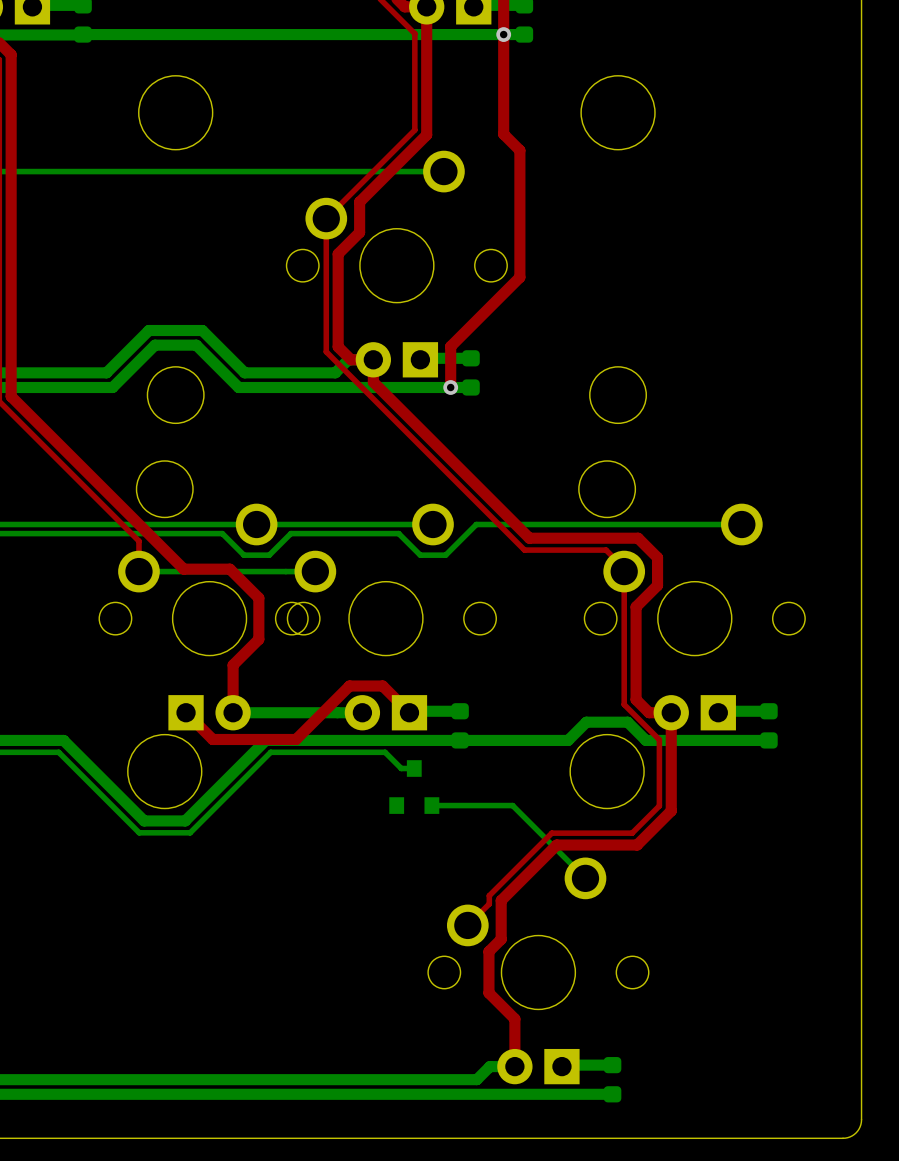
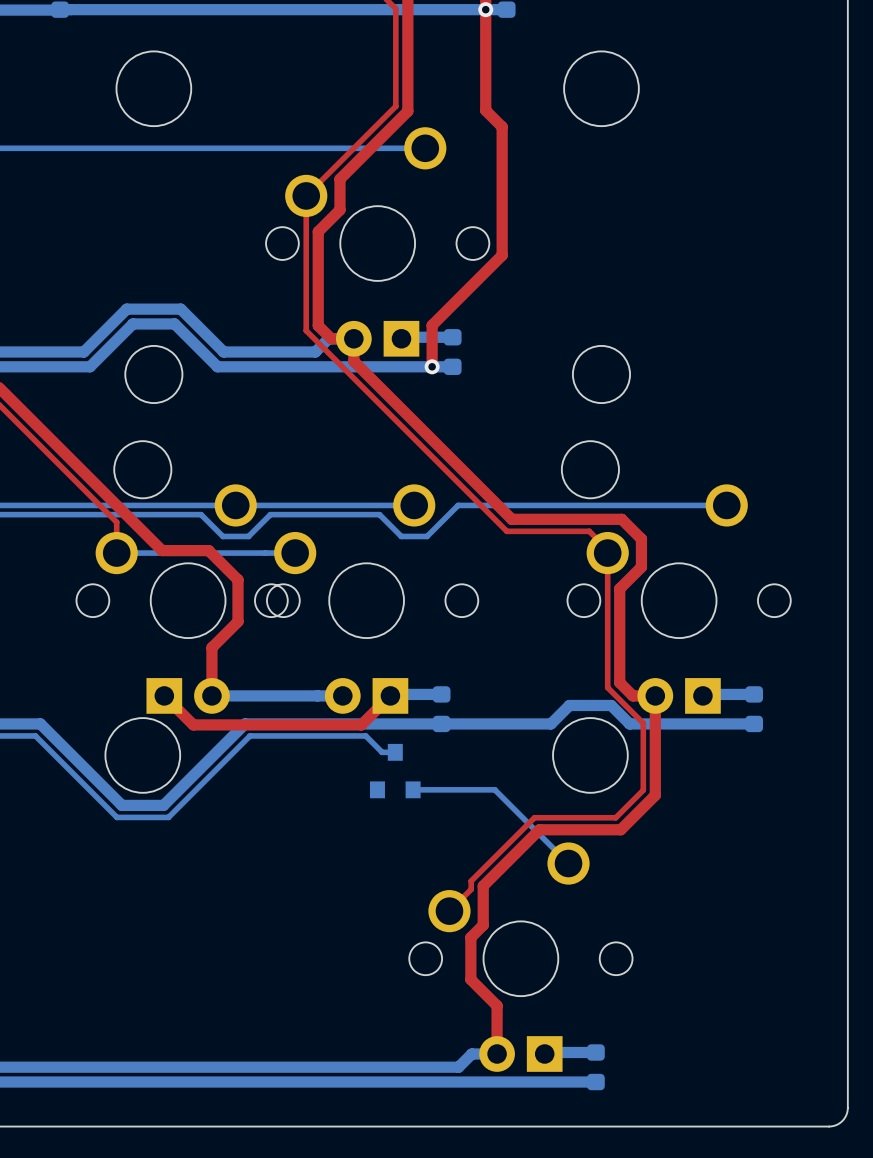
top track: (409, 712) (382, 686) (349, 686) (296, 739) (212, 739) -> (390, 695) (361, 724) (193, 724) (191, 722)

